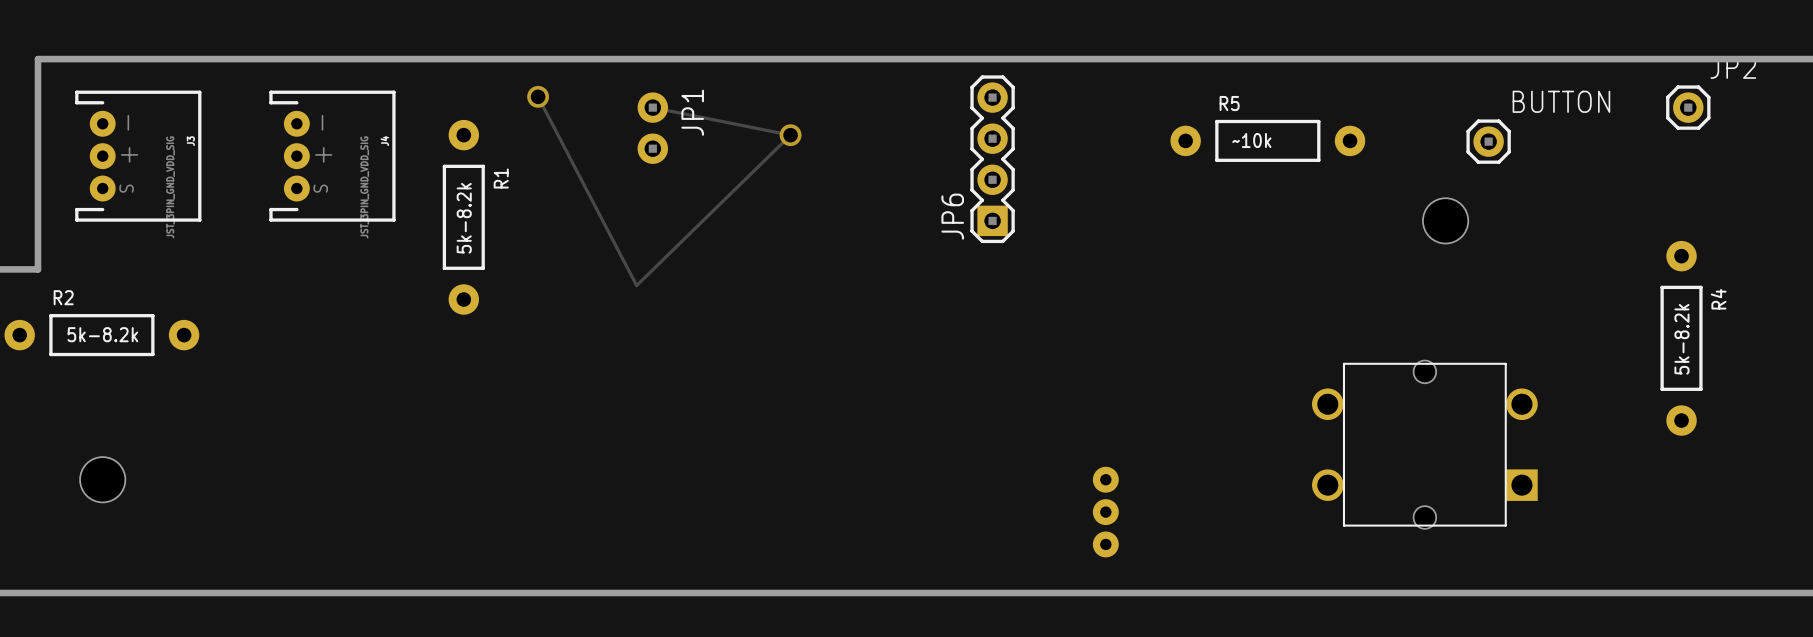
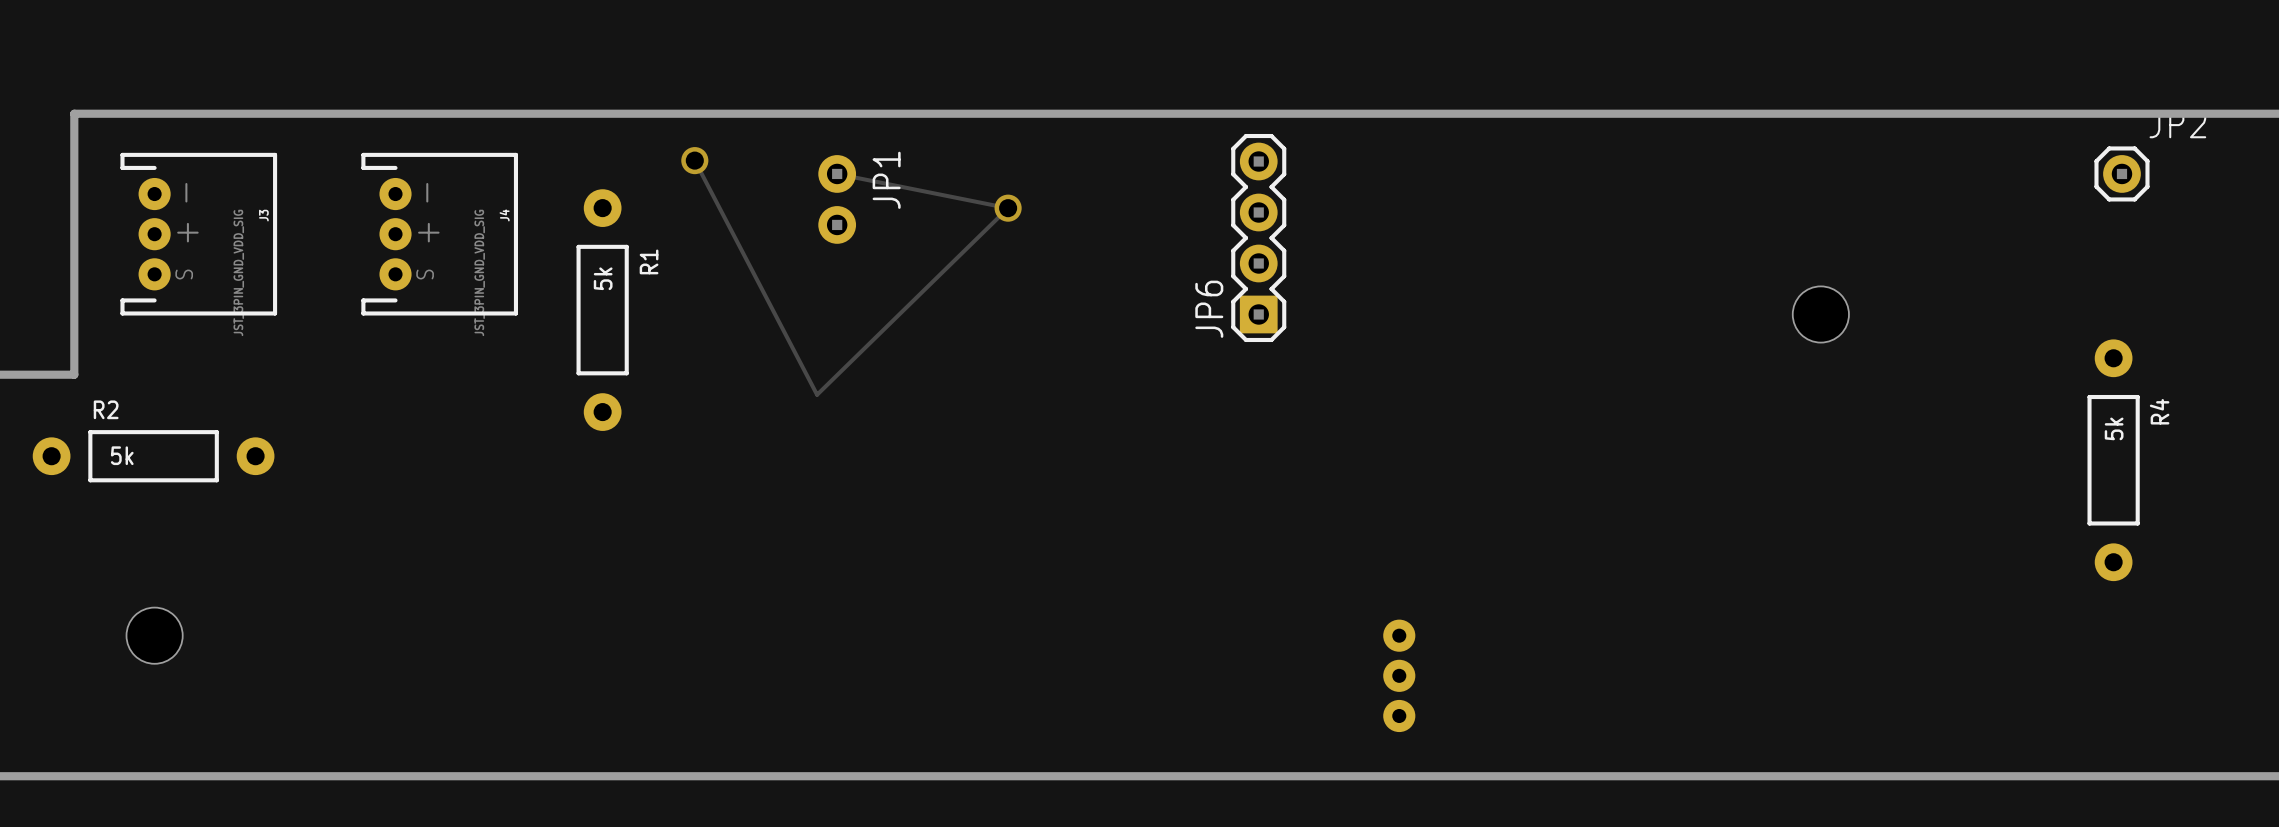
R5: ~10k (1267, 140) -> none
BUTTON: (1488, 141) -> none
R1 value: 5k-8.2k (464, 218) -> 5k (603, 278)
R2 value: 5k-8.2k (102, 334) -> 5k (122, 455)
R4 value: 5k-8.2k (1681, 339) -> 5k (2114, 428)
part: (1424, 444) -> none

